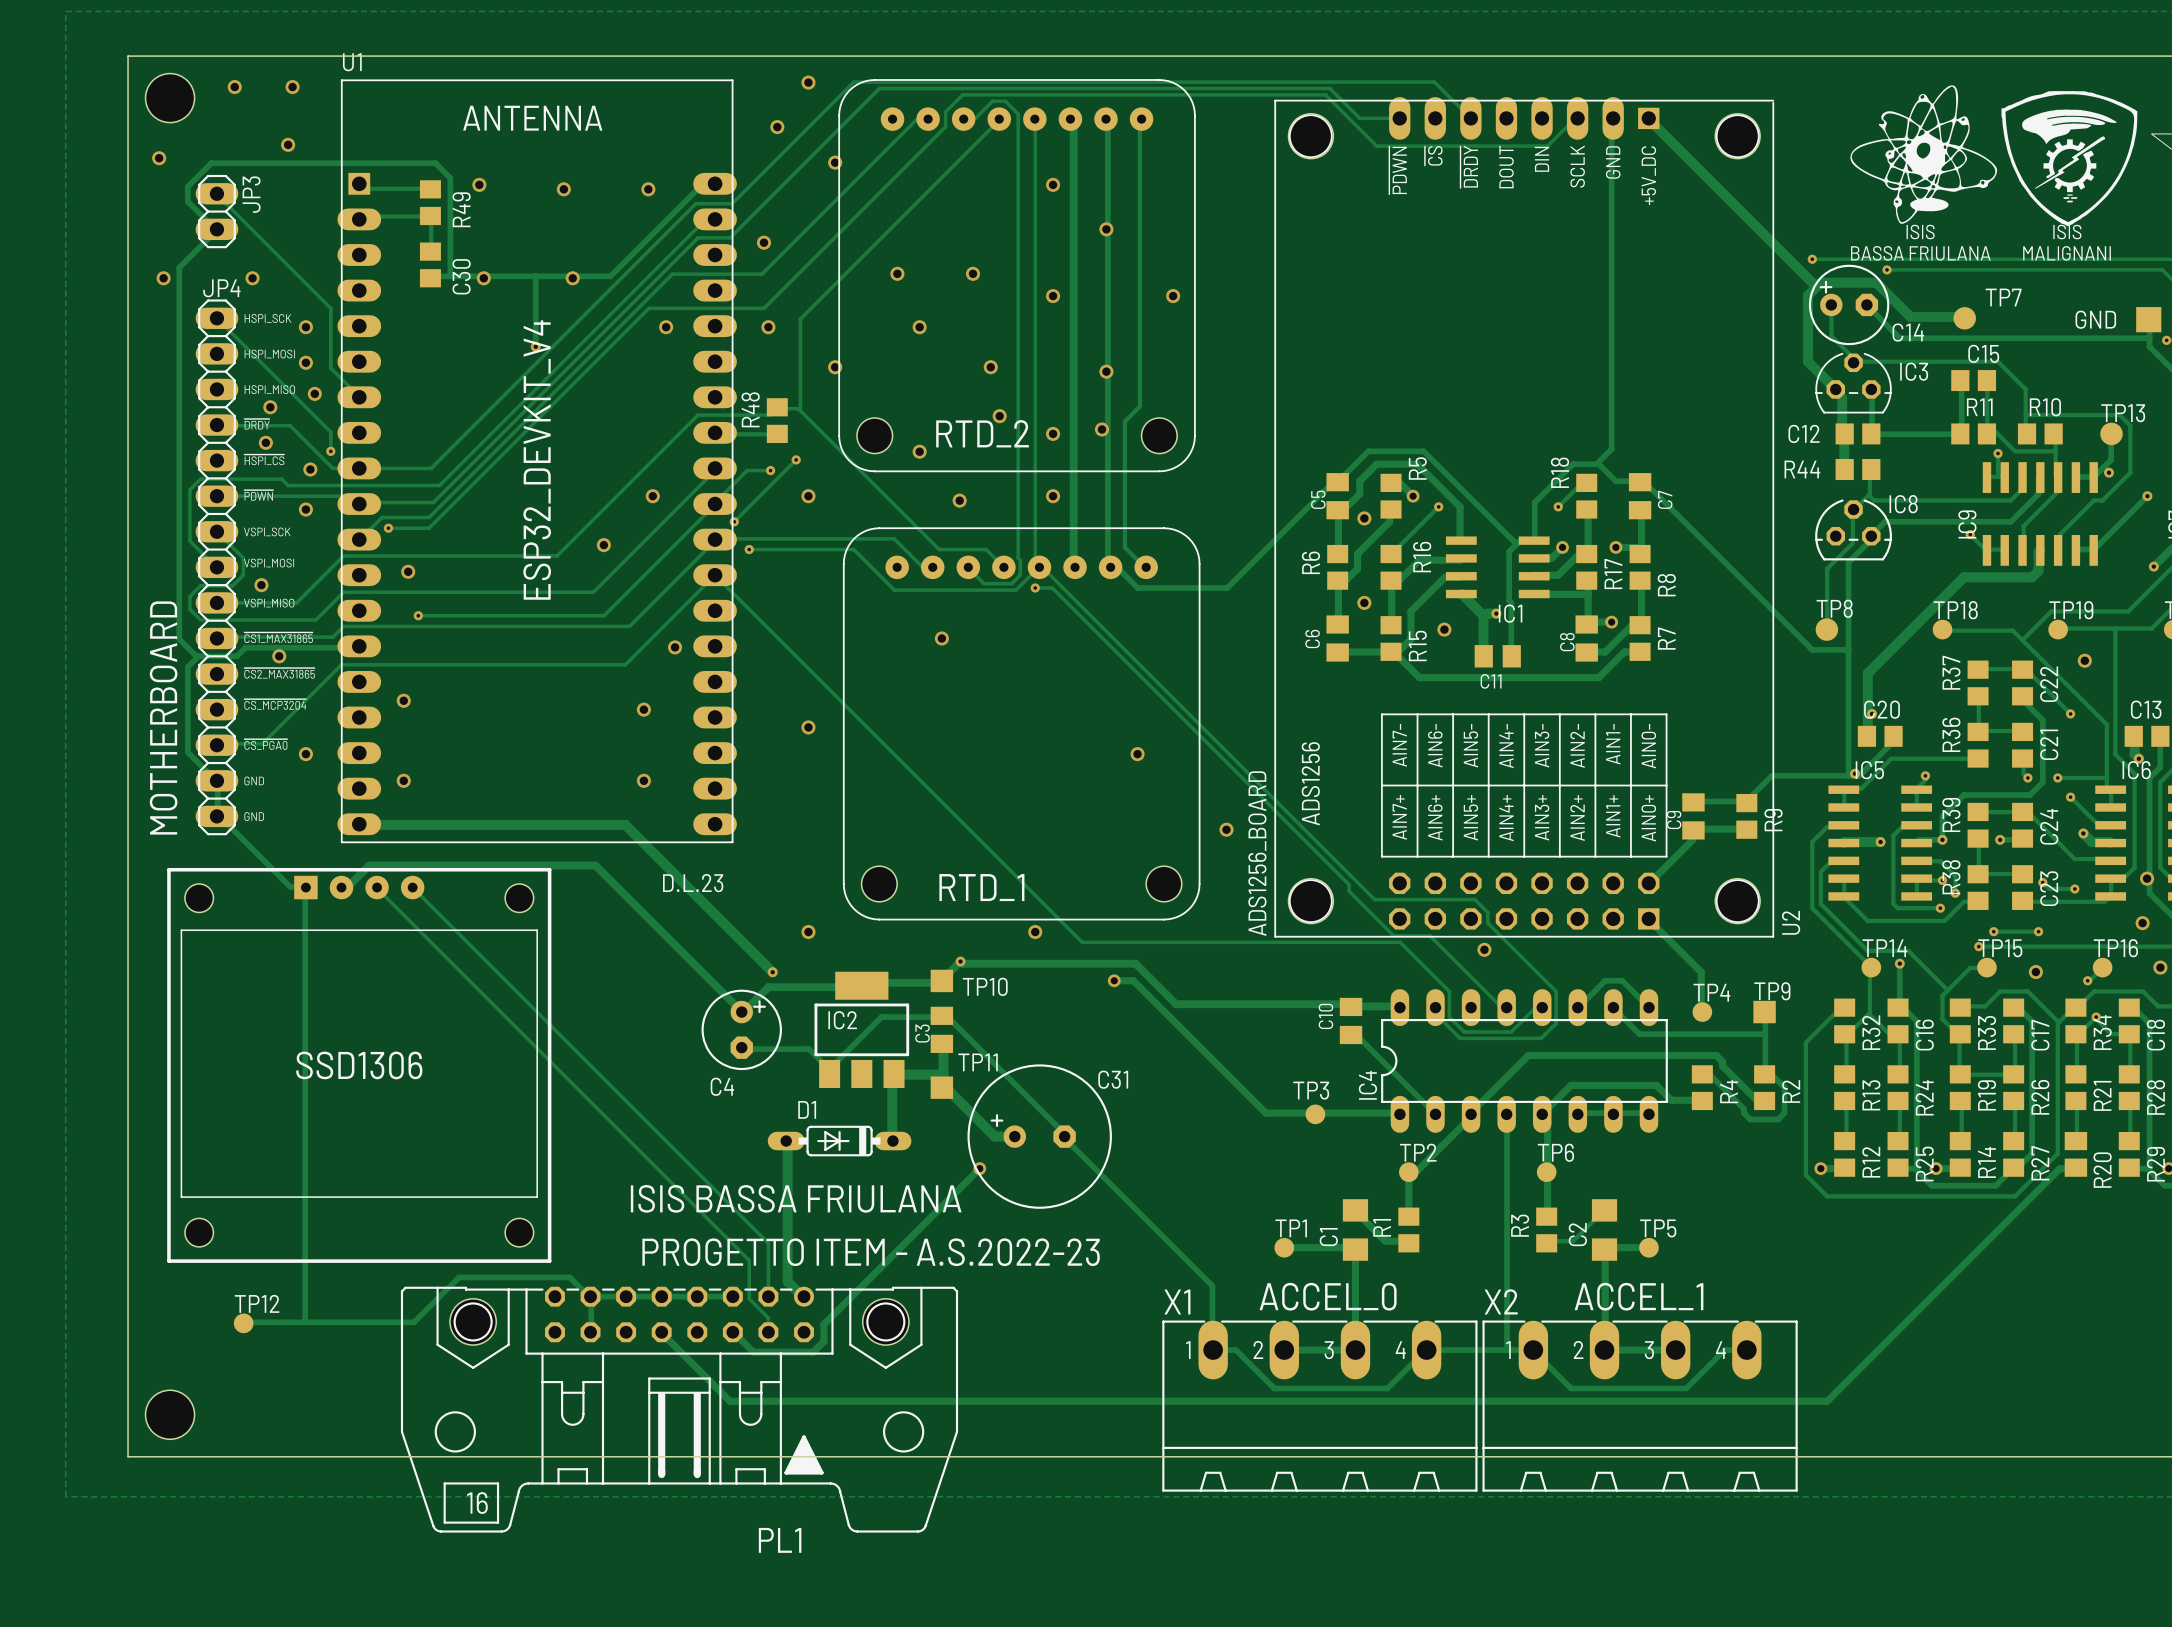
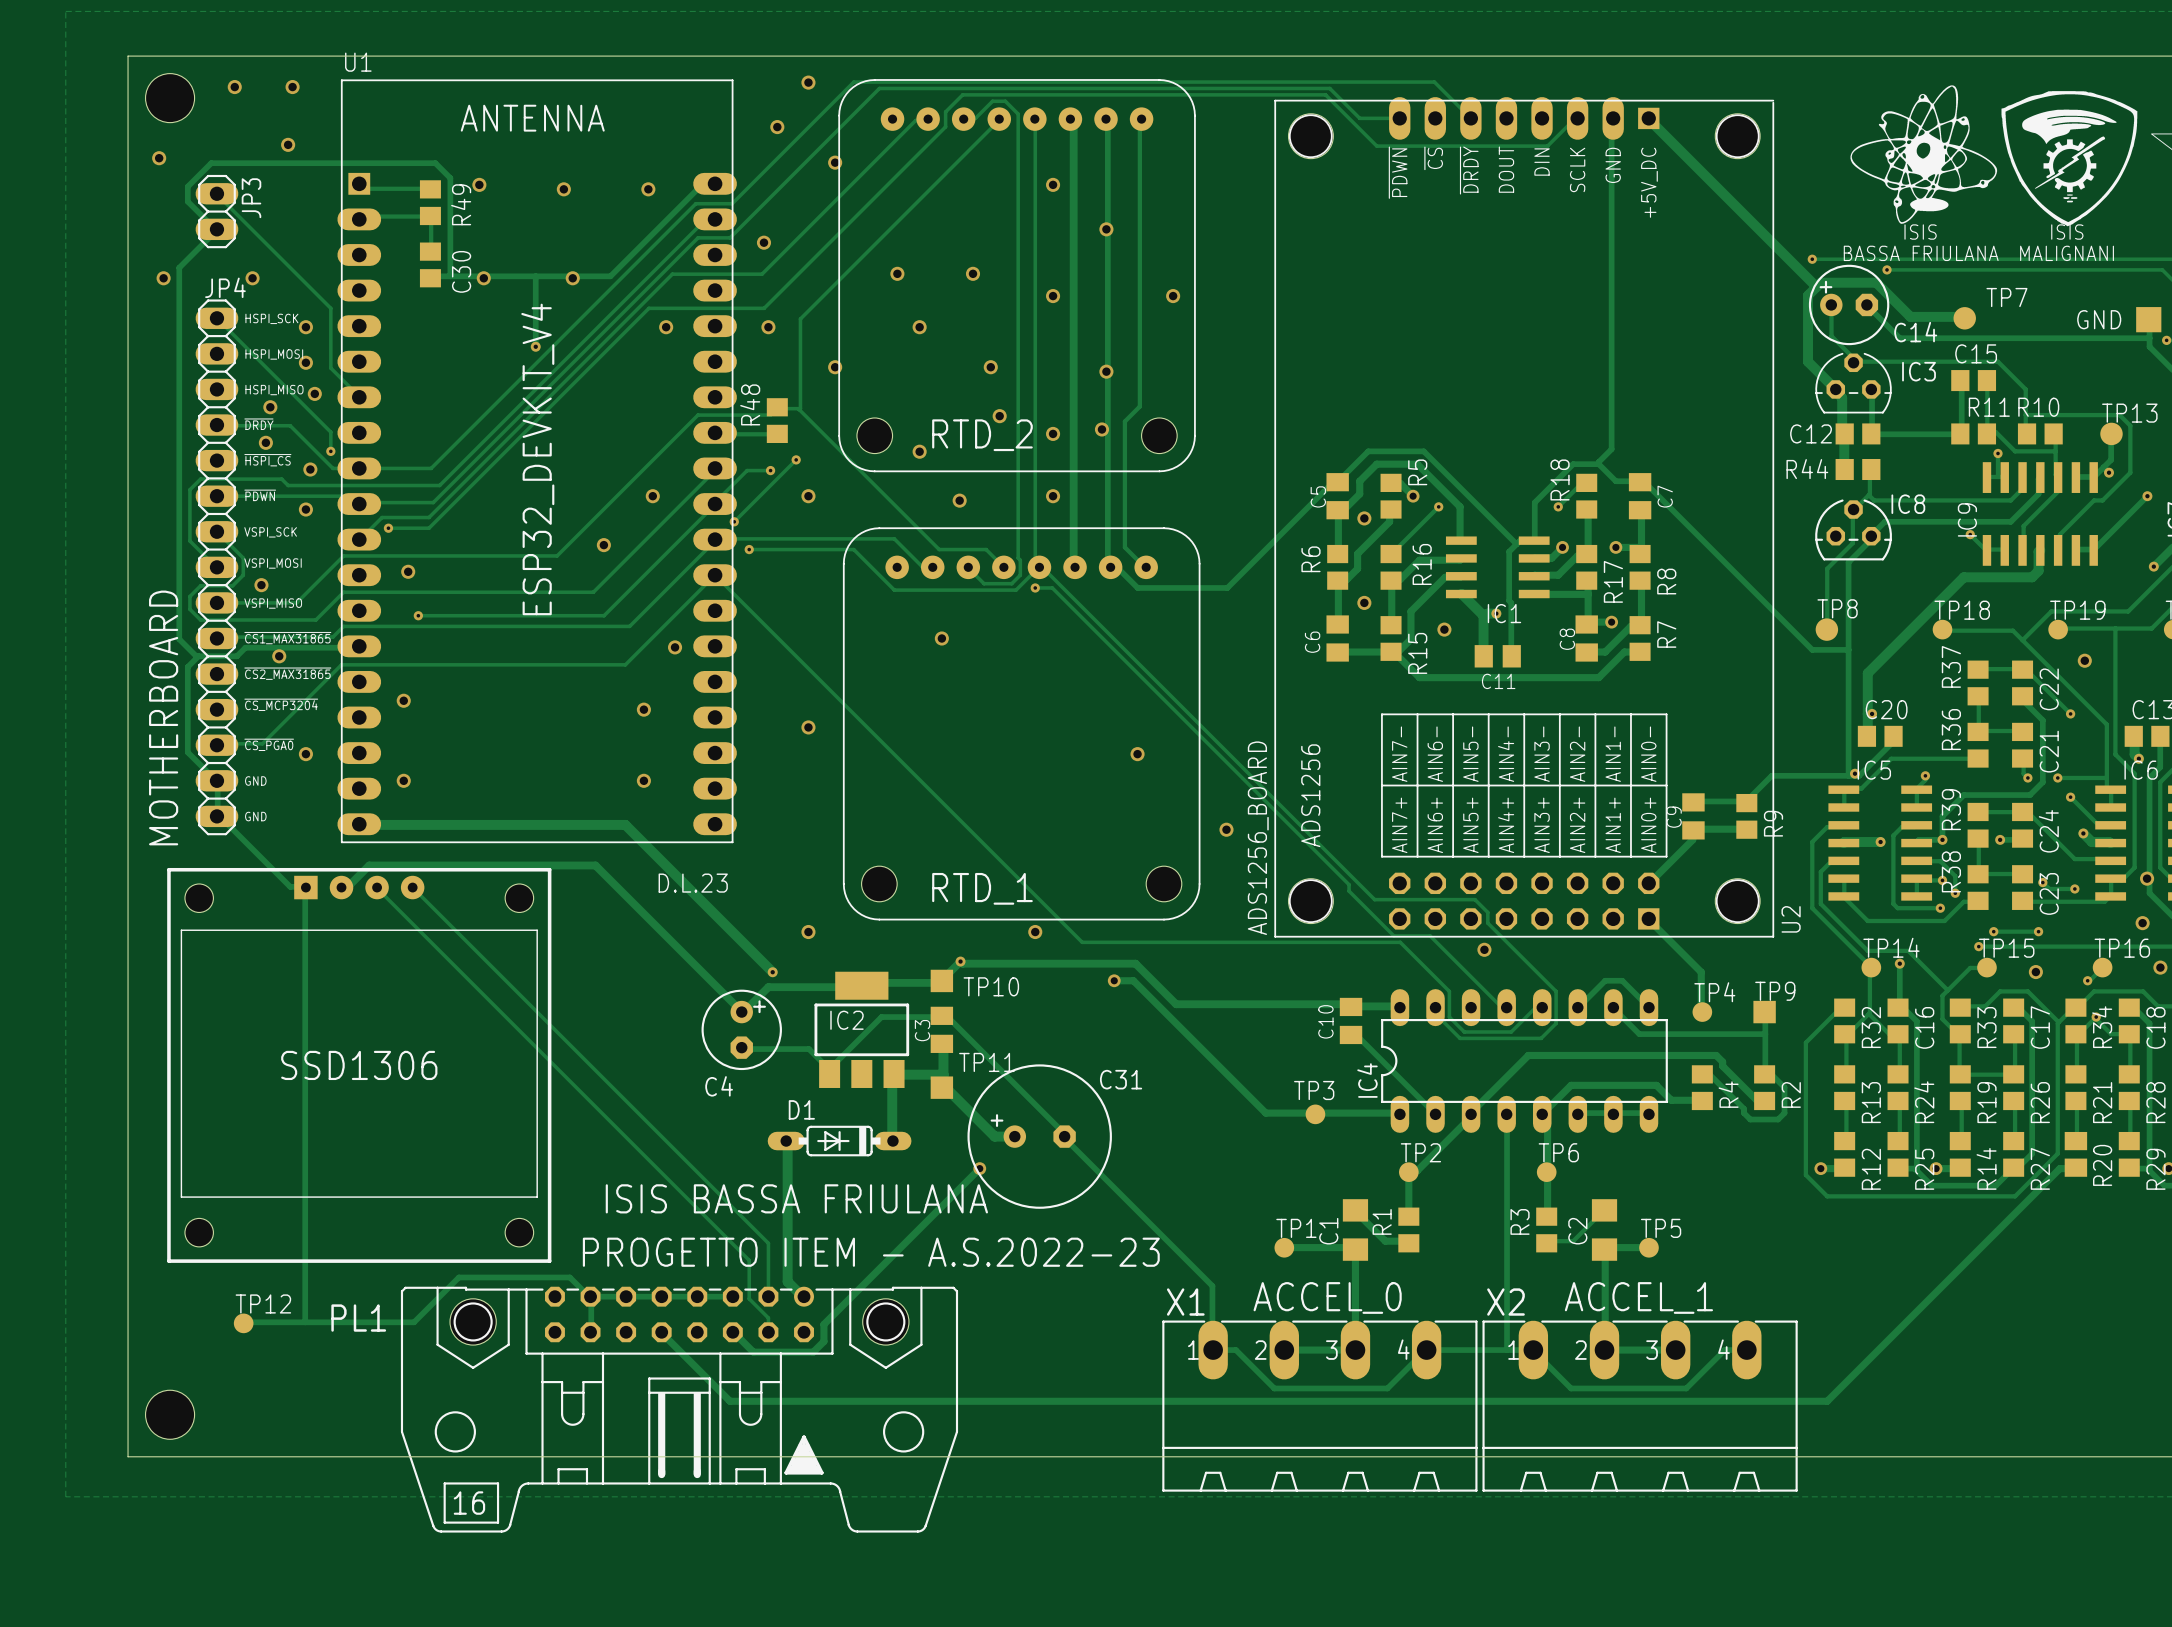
PL1 name position: PL1 (780, 1540) -> PL1 (358, 1318)

